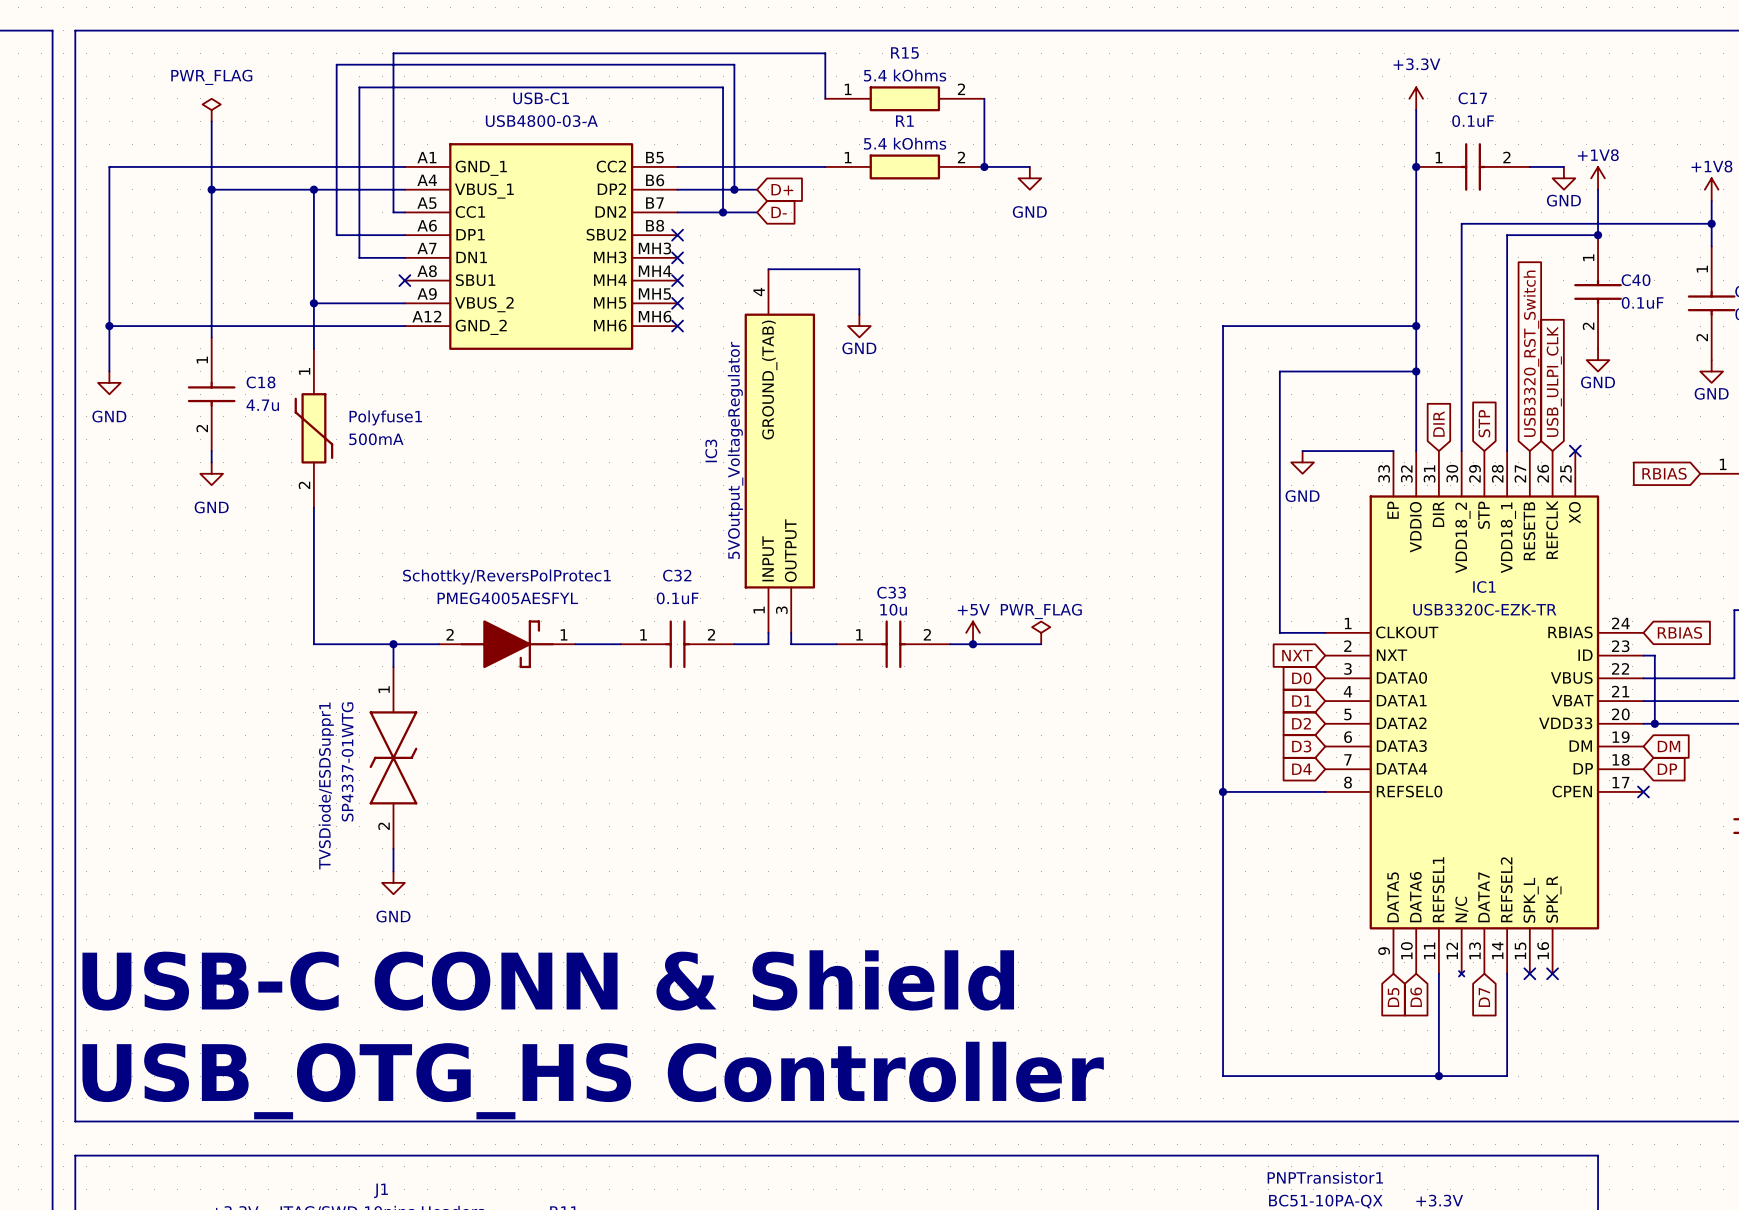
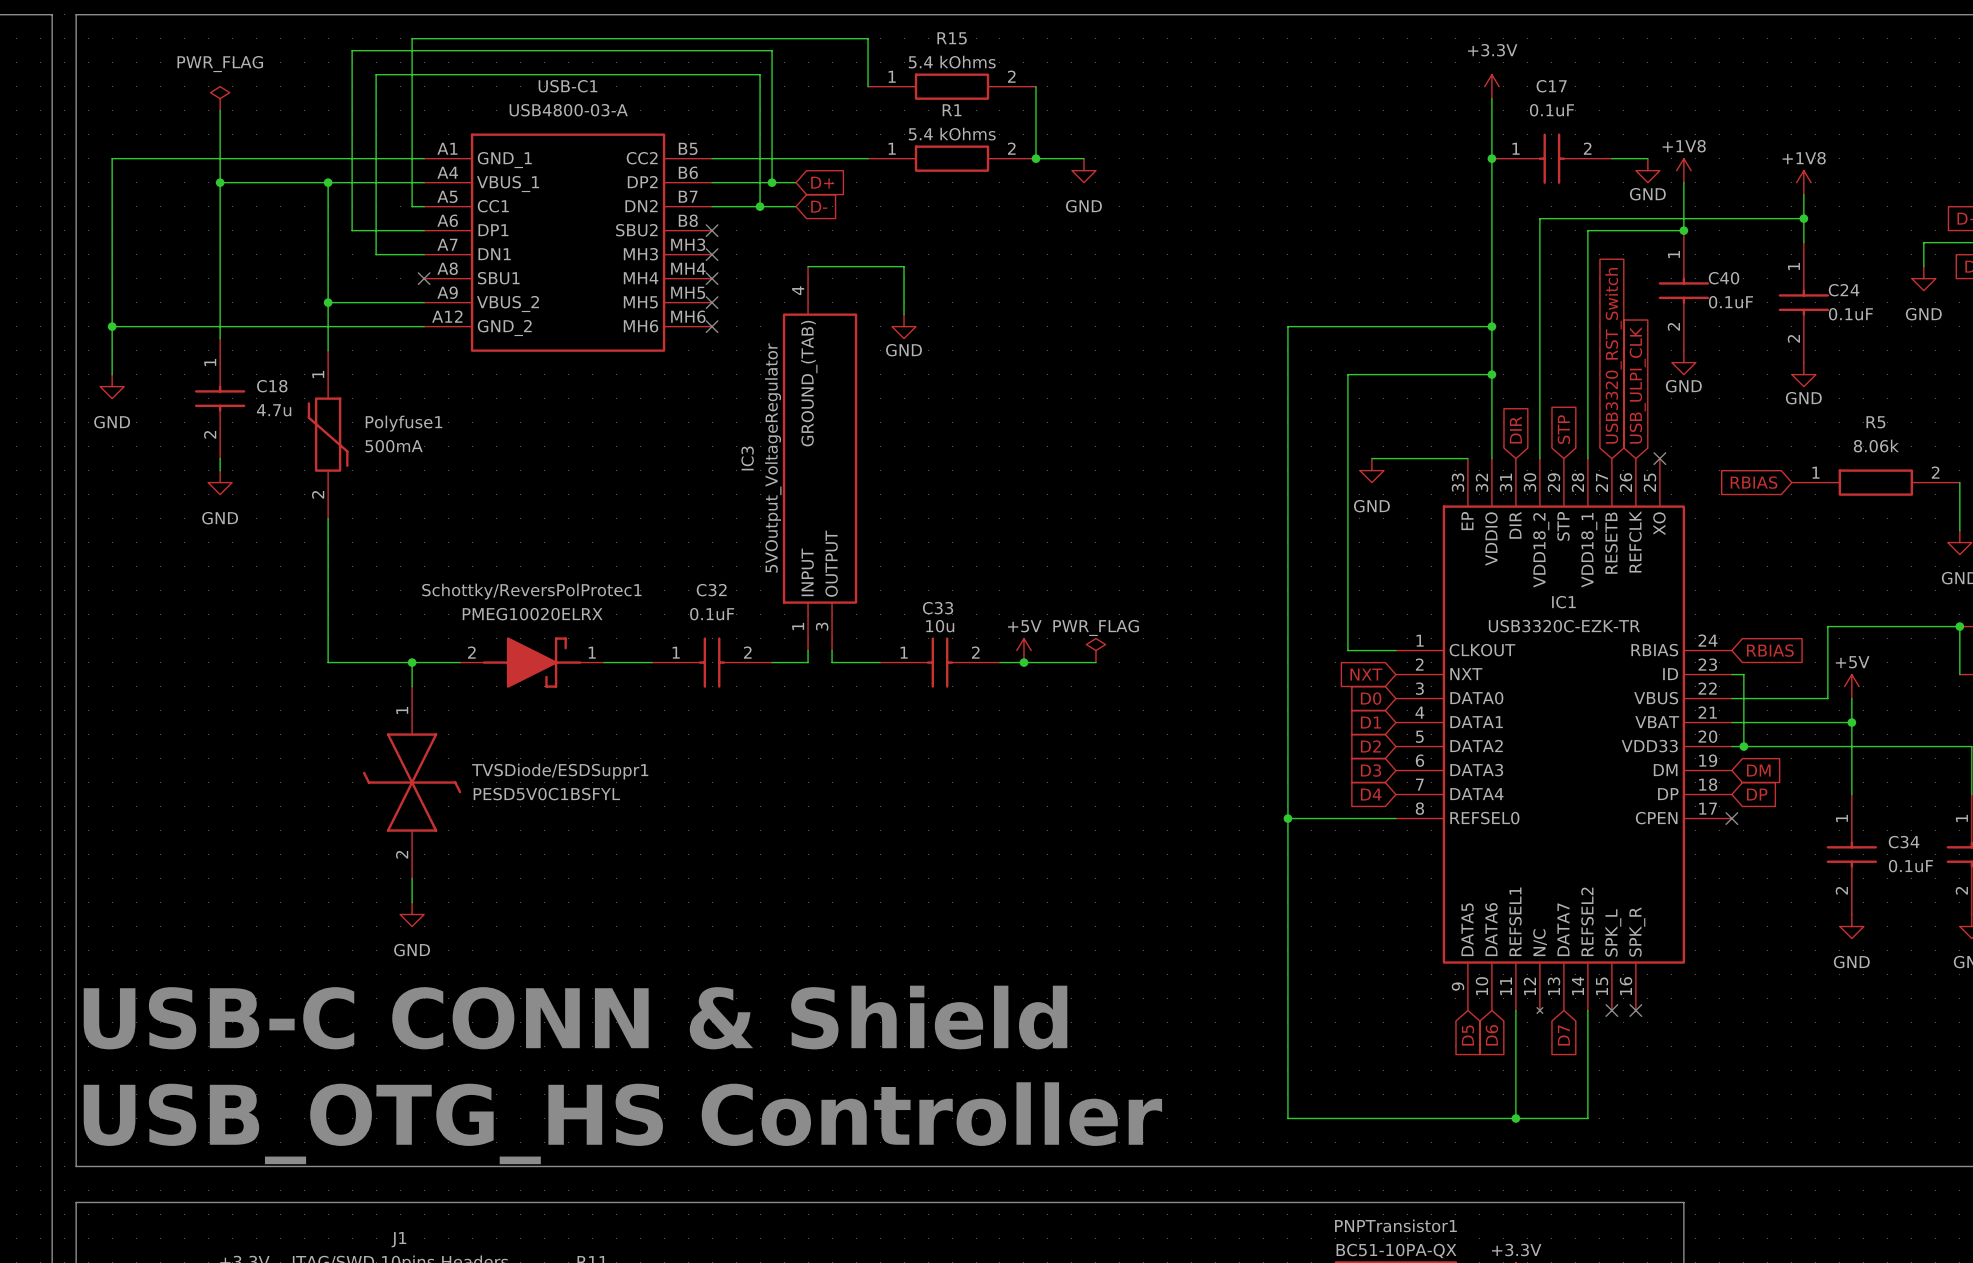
Schottky/ReversPolProtec1 value: PMEG4005AESFYL (507, 598) -> PMEG10020ELRX (532, 614)
TVSDiode/ESDSuppr1 symbol: [369, 666, 418, 849] -> [362, 686, 462, 879]
TVSDiode/ESDSuppr1 value: SP4337-01WTG (347, 761) -> PESD5V0C1BSFYL (546, 794)
TVSDiode/ESDSuppr1 name position: TVSDiode/ESDSuppr1 (326, 785) -> TVSDiode/ESDSuppr1 (560, 771)

